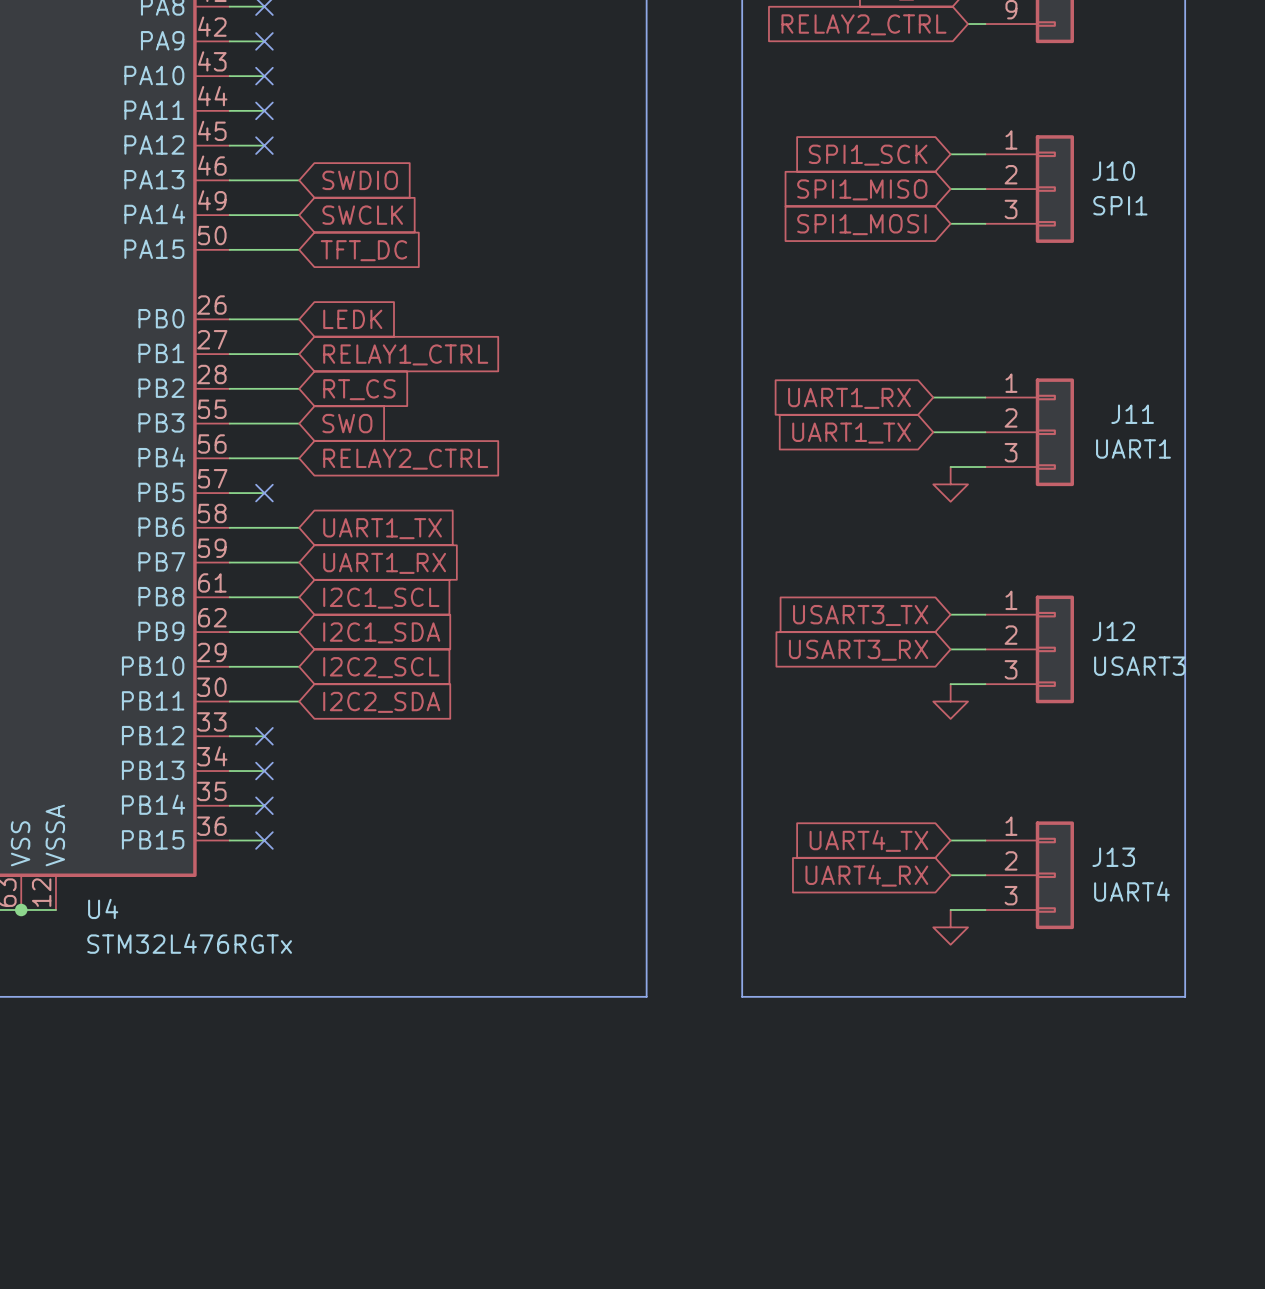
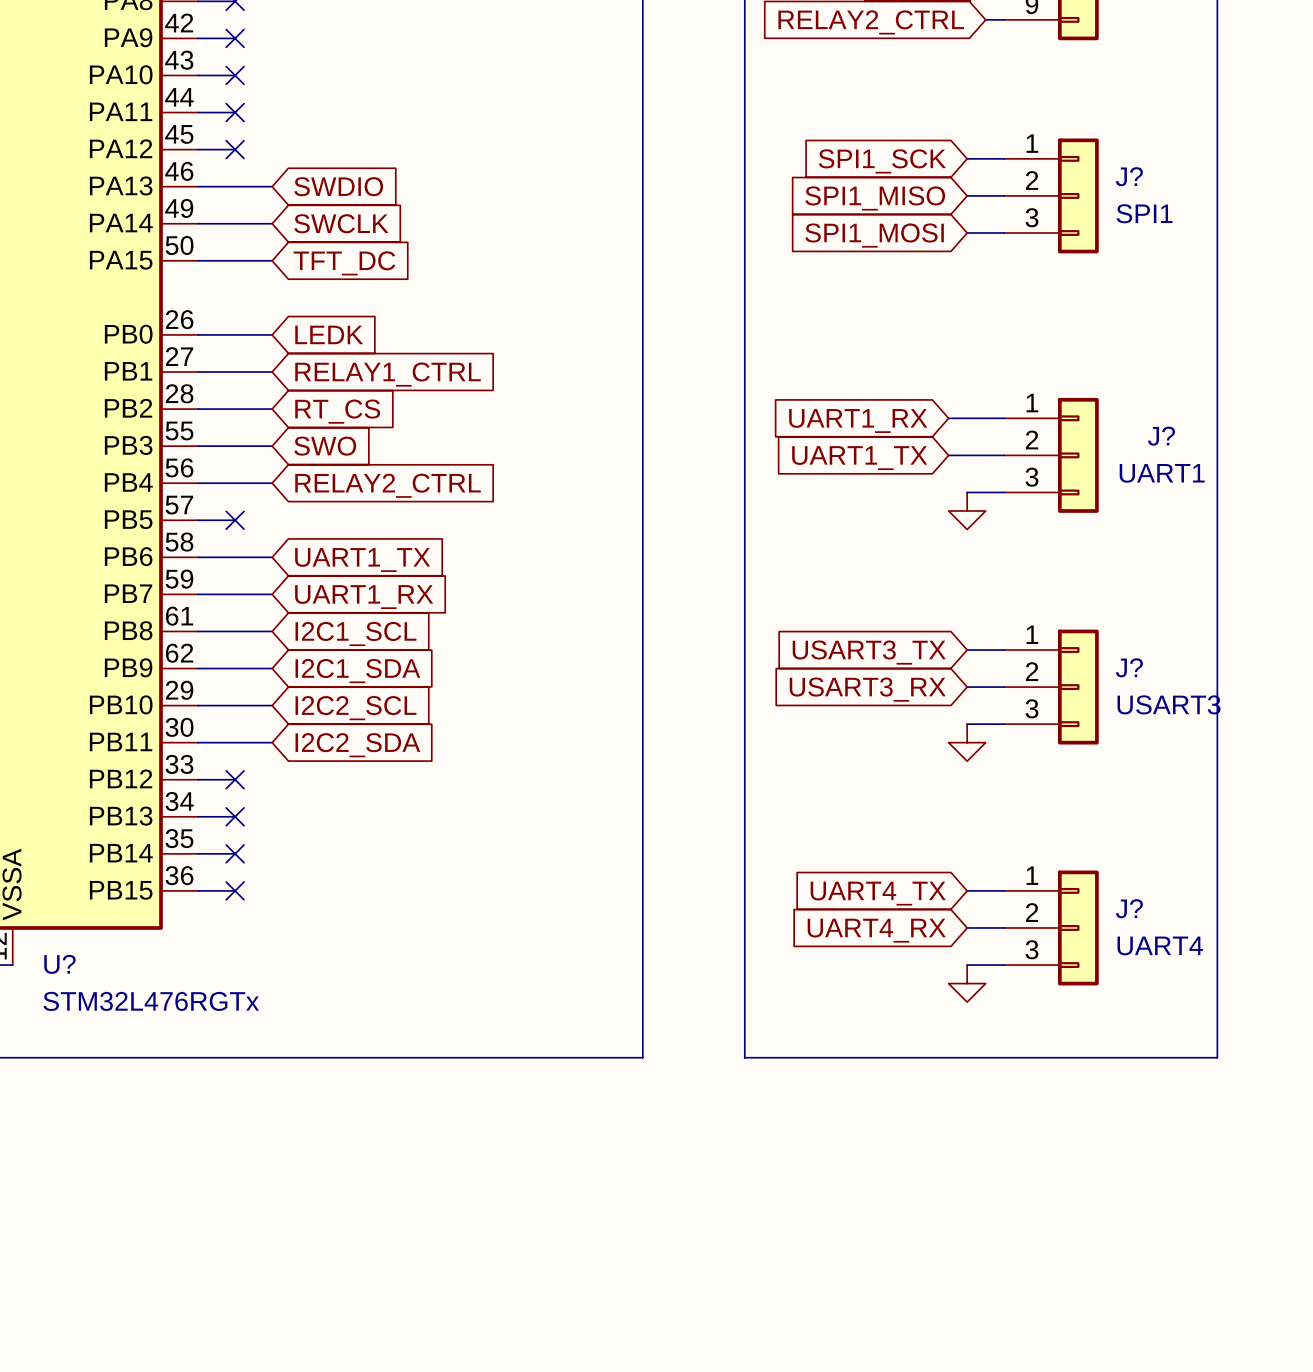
J10 name: J10 (1113, 171) -> J? (1129, 176)
J11 name: J11 (1132, 414) -> J? (1161, 436)
J12 name: J12 (1113, 631) -> J? (1129, 667)
J13 name: J13 (1113, 857) -> J? (1129, 908)
U4 name: U4 (103, 908) -> U? (59, 964)

